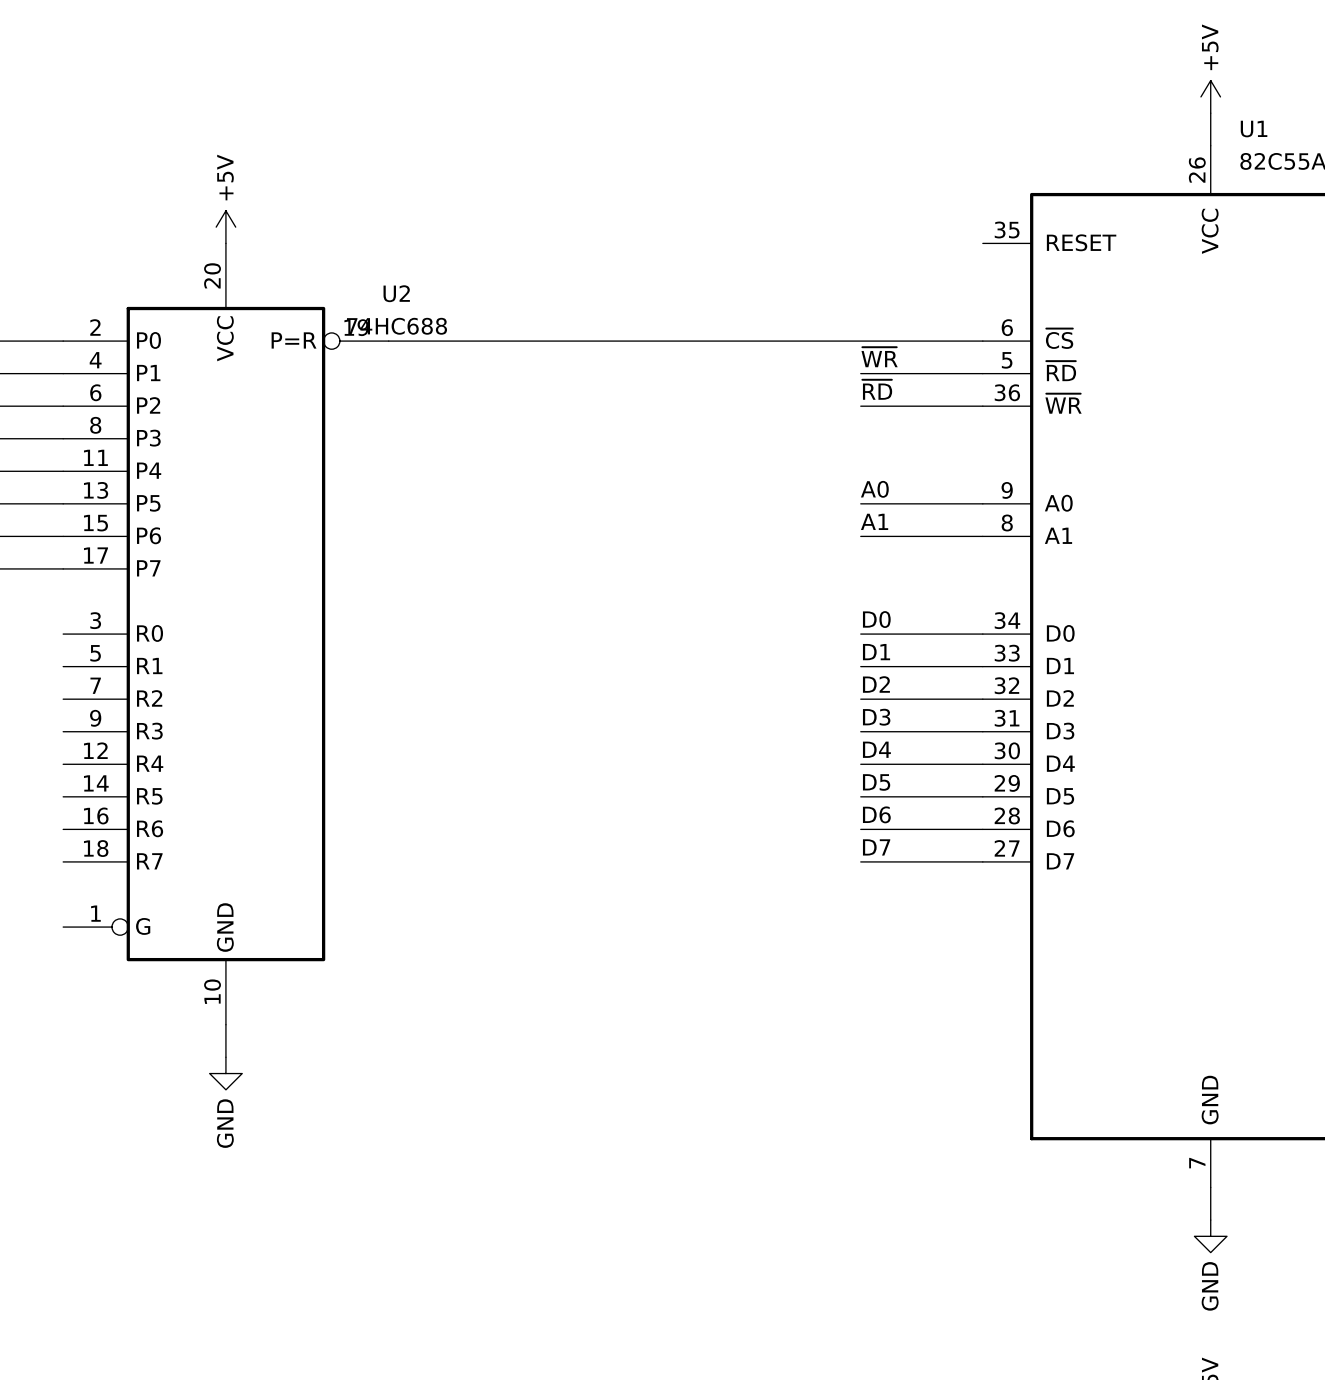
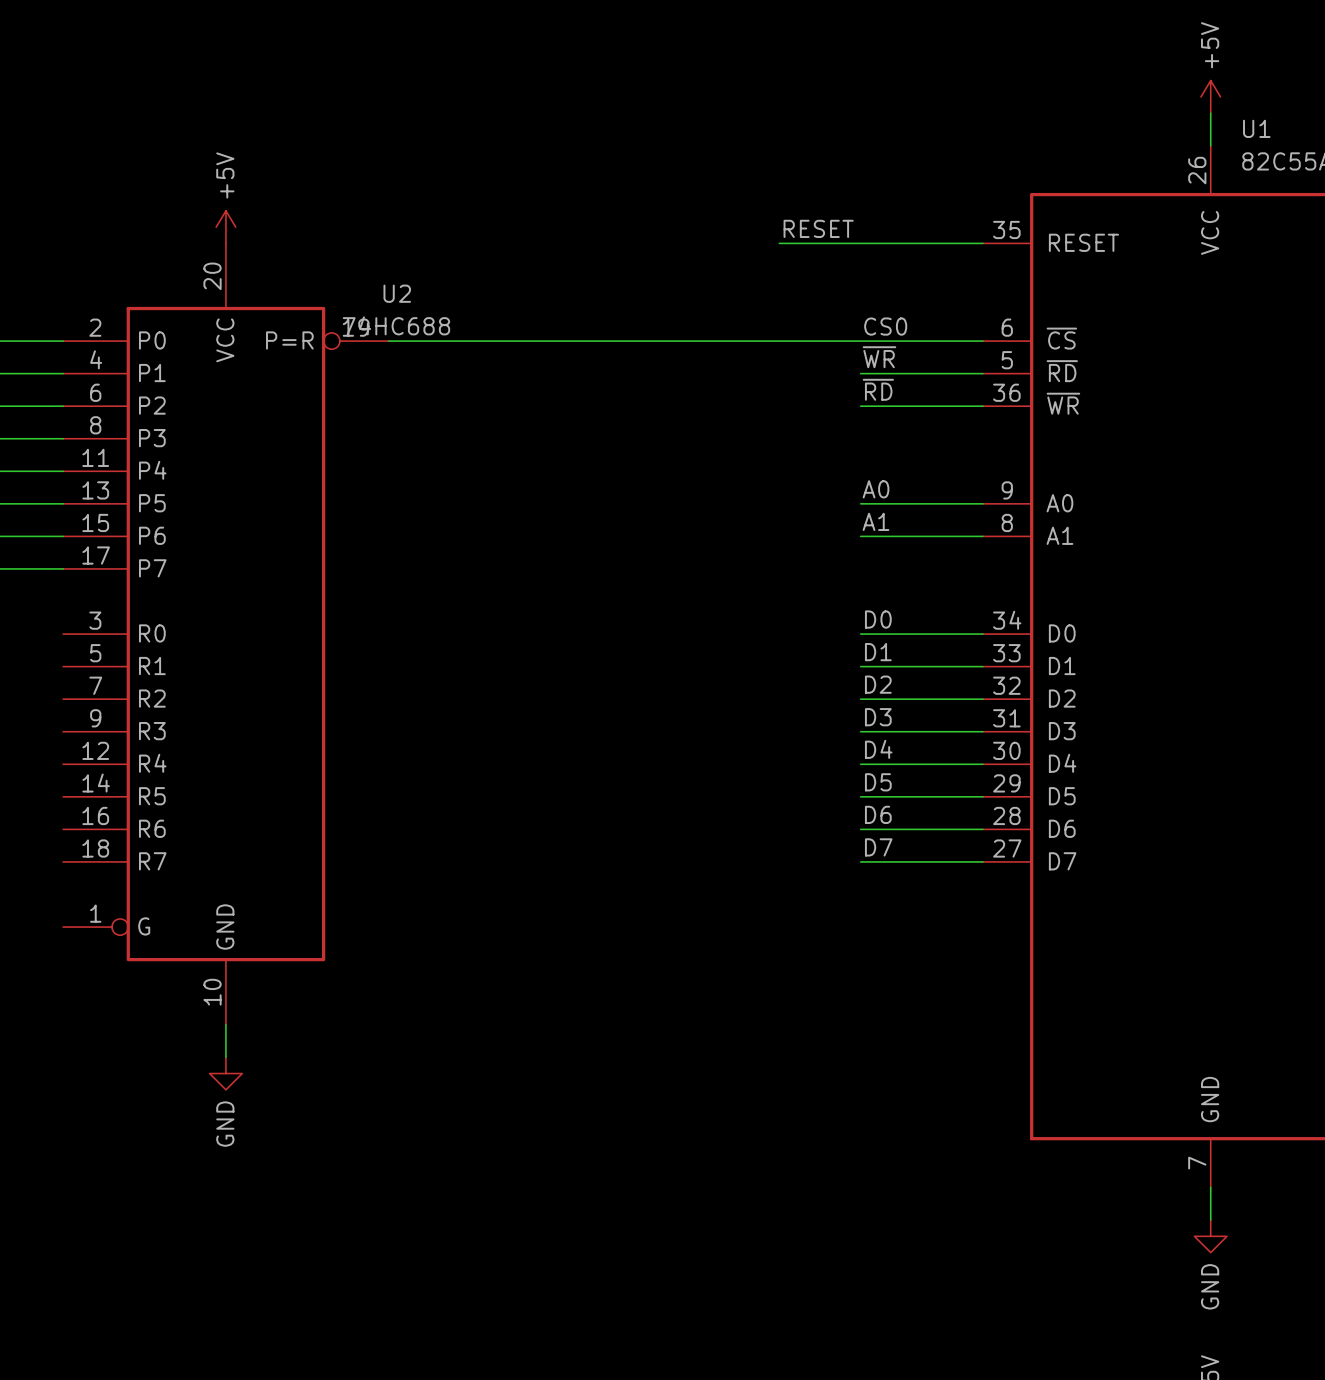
label: none -> RESET (818, 228)
wire: none -> (779, 243) (982, 243)
label: none -> CS0 (885, 326)

